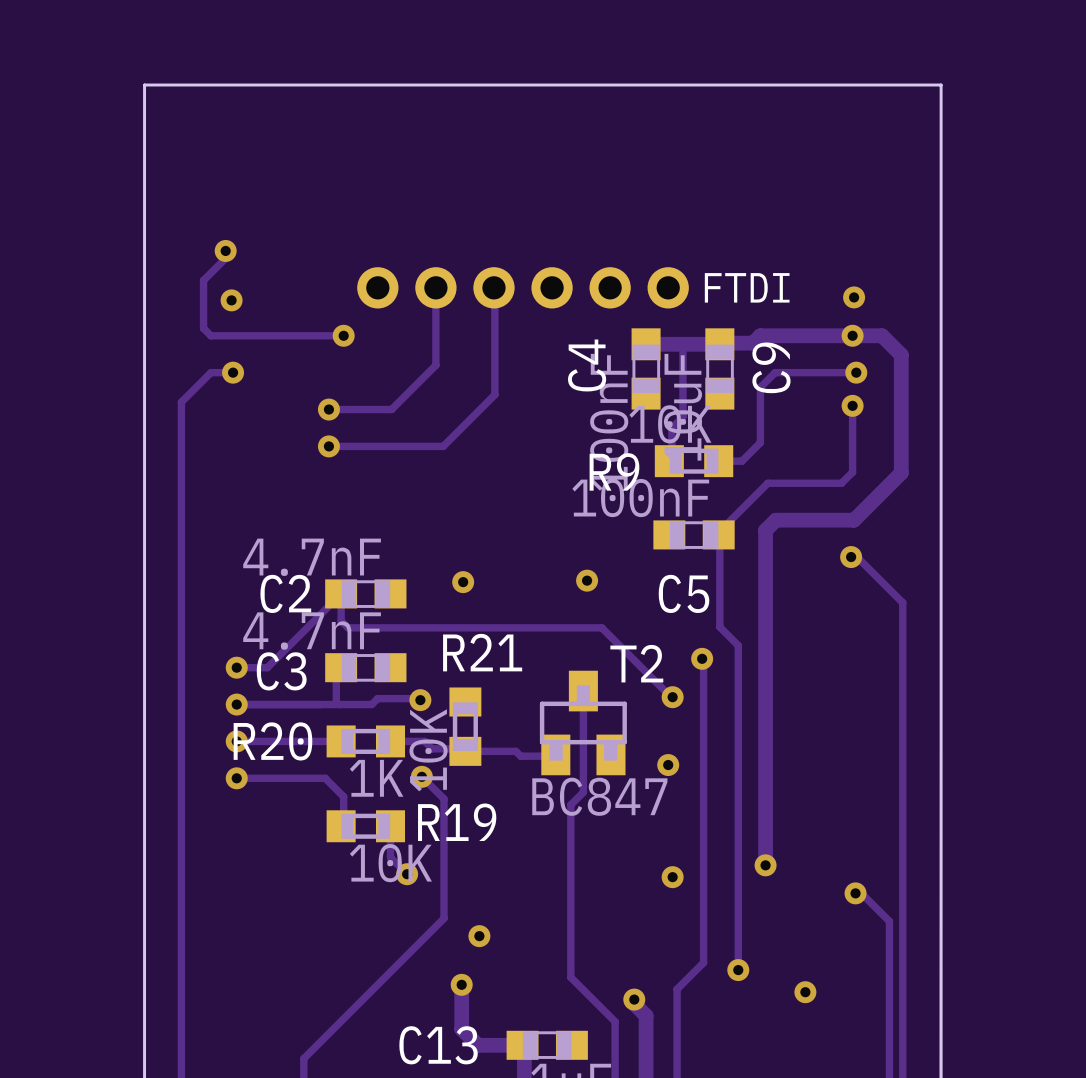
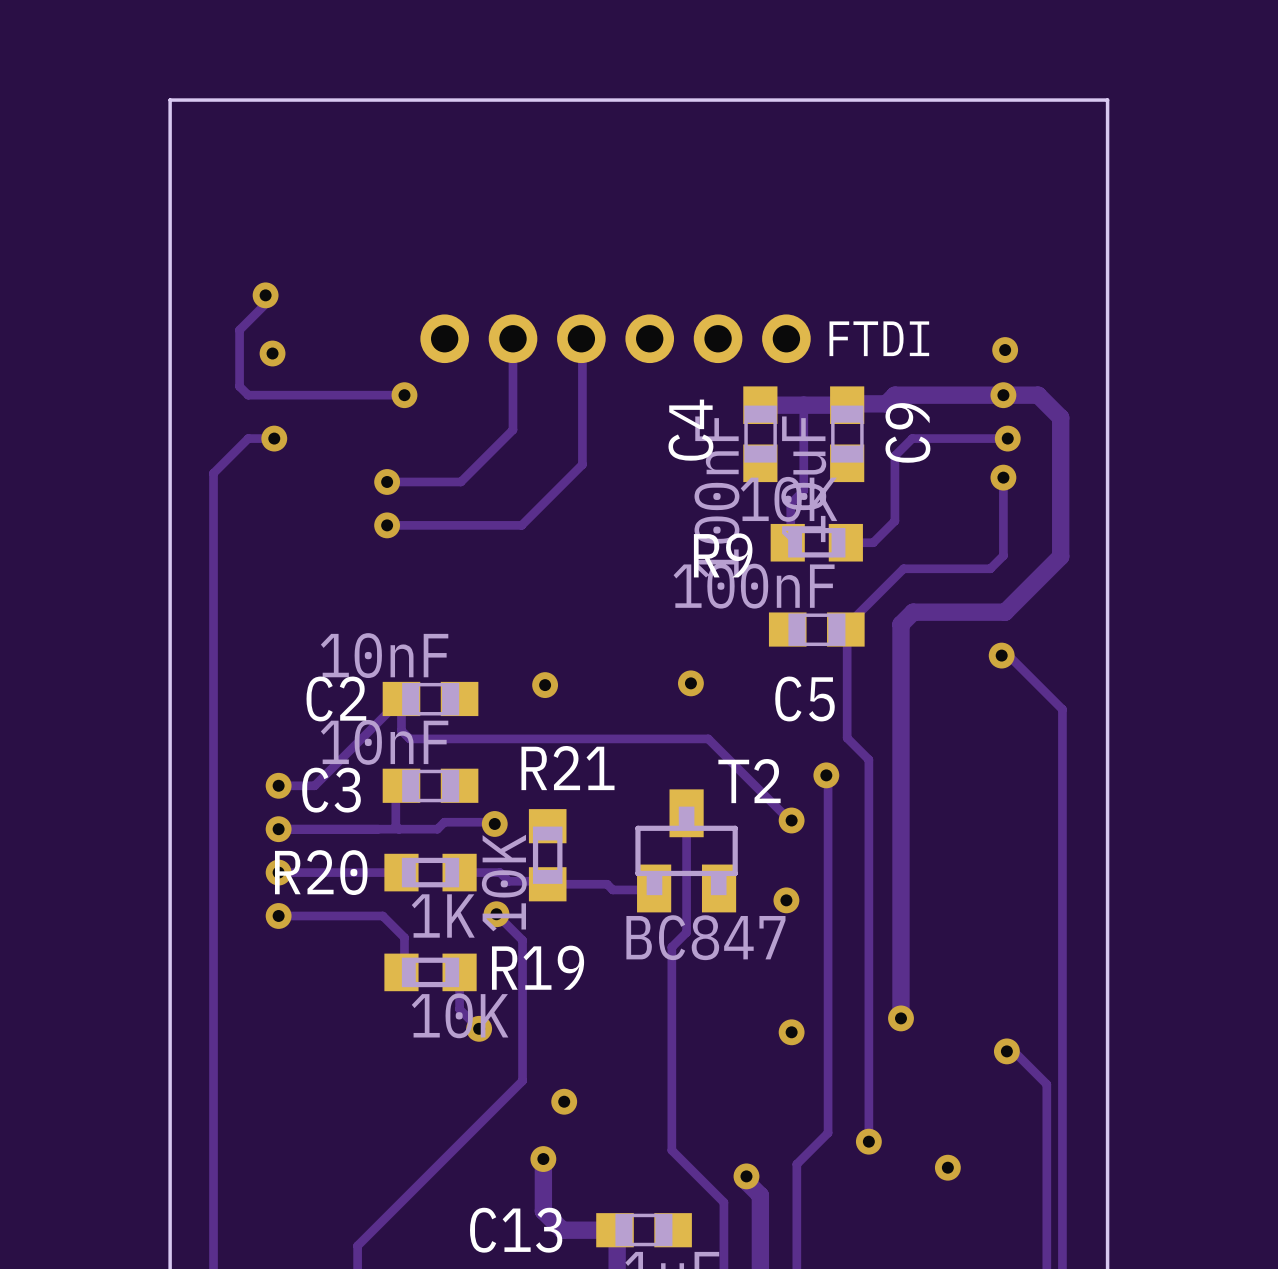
C2 value: 4.7nF (312, 557) -> 10nF (384, 655)
C3 value: 4.7nF (312, 631) -> 10nF (384, 742)

